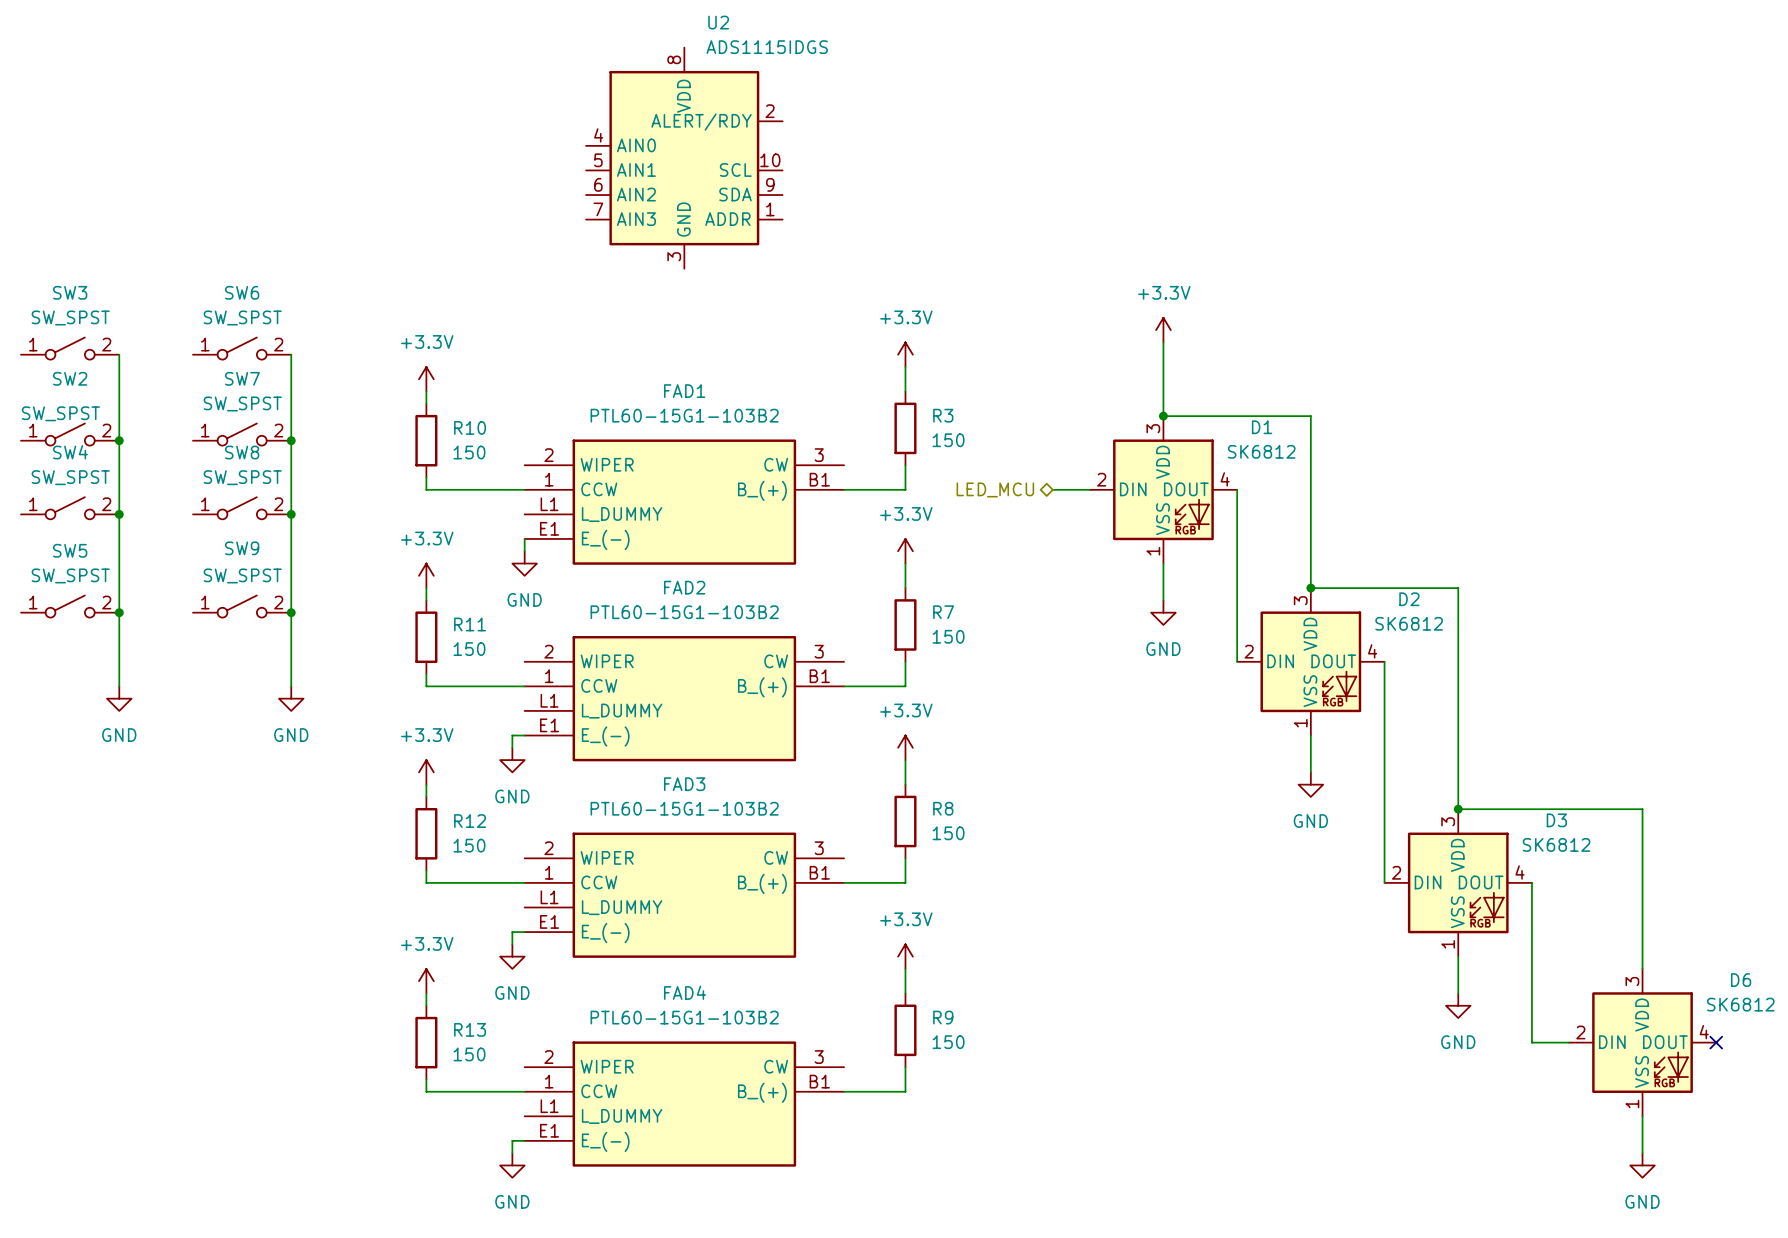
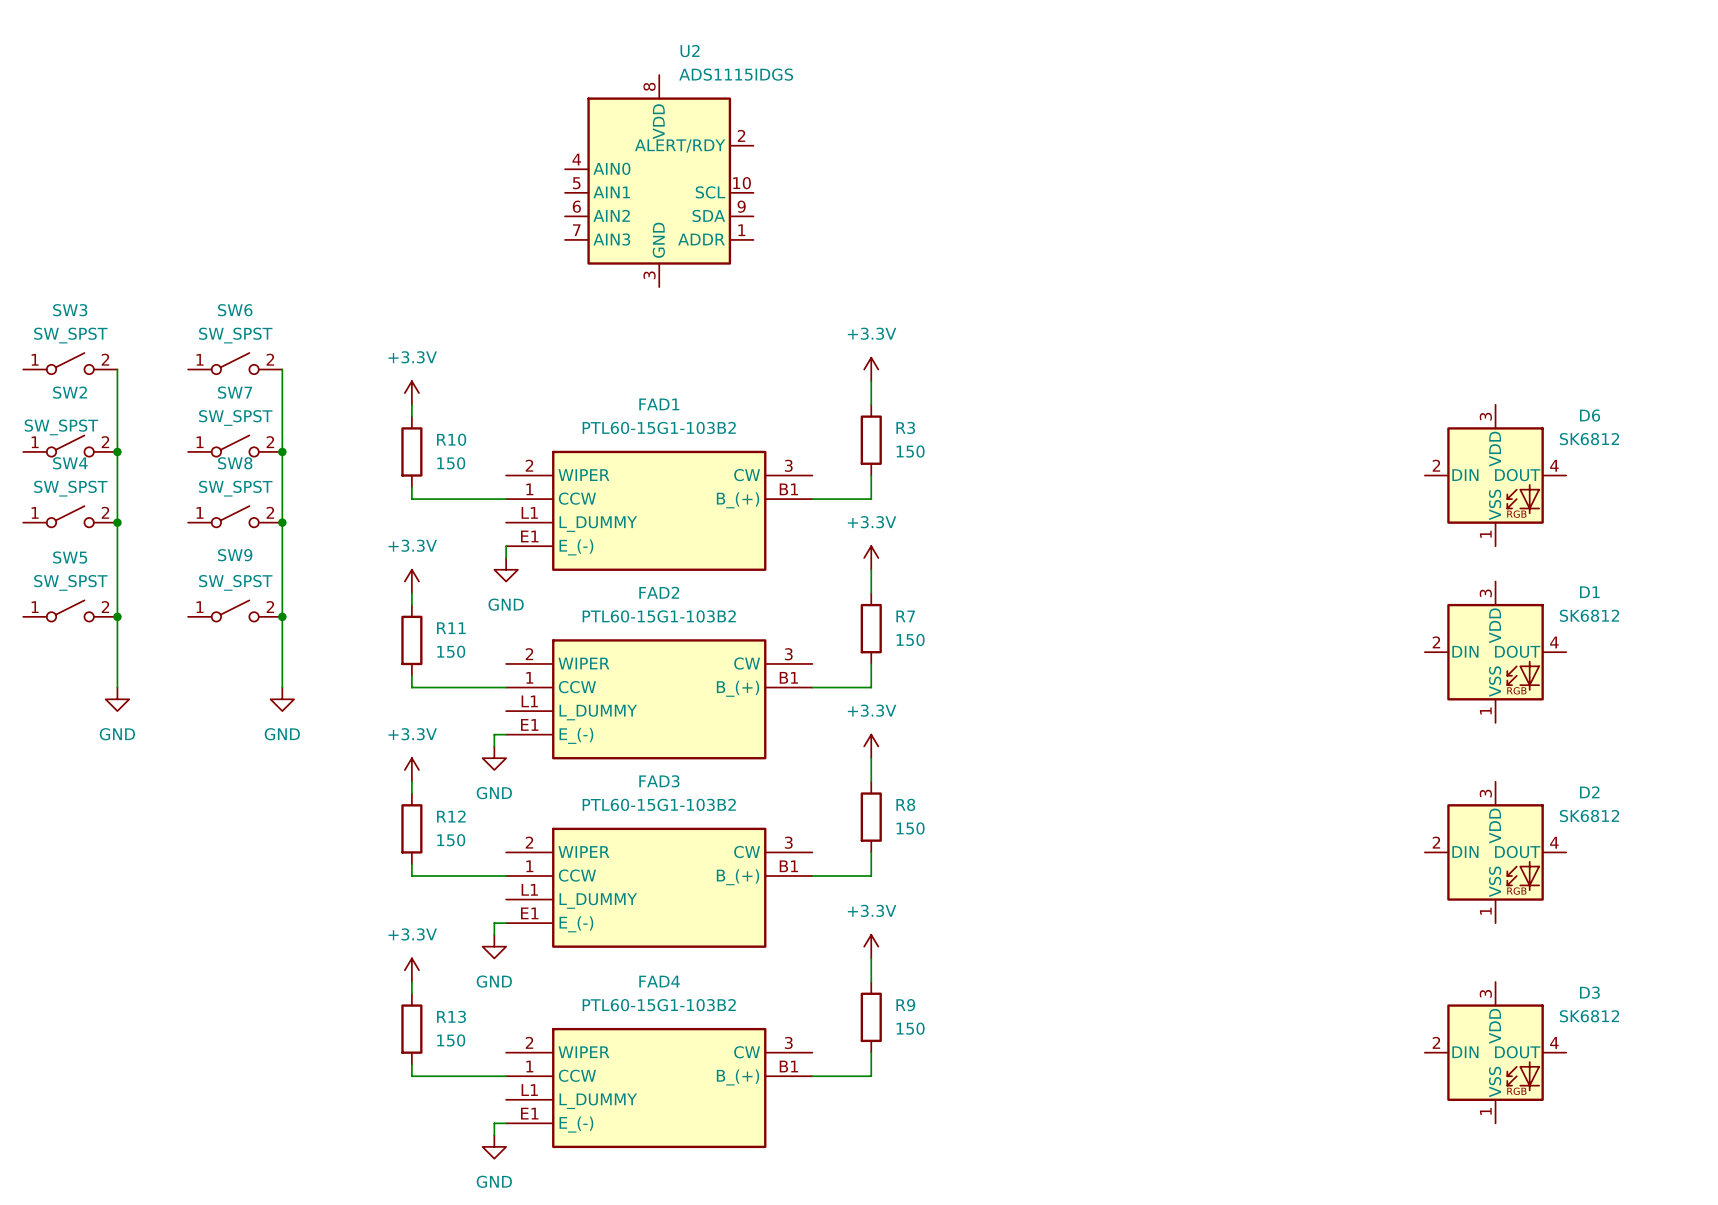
power symbol: +3.3V (1163, 330) -> none
wire: (1163, 342) (1163, 416) (1310, 416) (1310, 588) (1458, 588) (1458, 809) (1642, 809) (1642, 968) -> none
junction: (1163, 416) -> none
hierarchical label: LED_MCU (995, 489) -> none
wire: (1052, 489) (1089, 489) -> none
D1 position: (1163, 489) -> (1495, 652)
wire: (1237, 489) (1237, 661) -> none
wire: (1163, 563) (1163, 600) -> none
junction: (1310, 588) -> none
power symbol: GND (1163, 612) -> none
D2 position: (1310, 661) -> (1495, 852)
wire: (1384, 661) (1384, 882) -> none
wire: (1310, 735) (1310, 772) -> none
power symbol: GND (1310, 784) -> none
junction: (1458, 809) -> none
D3 position: (1458, 882) -> (1495, 1052)
wire: (1531, 882) (1531, 1042) (1568, 1042) -> none
wire: (1458, 956) (1458, 993) -> none
power symbol: GND (1458, 1005) -> none
D6 position: (1642, 1042) -> (1495, 475)
no-connect mark: (1716, 1042) -> none
wire: (1642, 1116) (1642, 1153) -> none
power symbol: GND (1642, 1165) -> none

